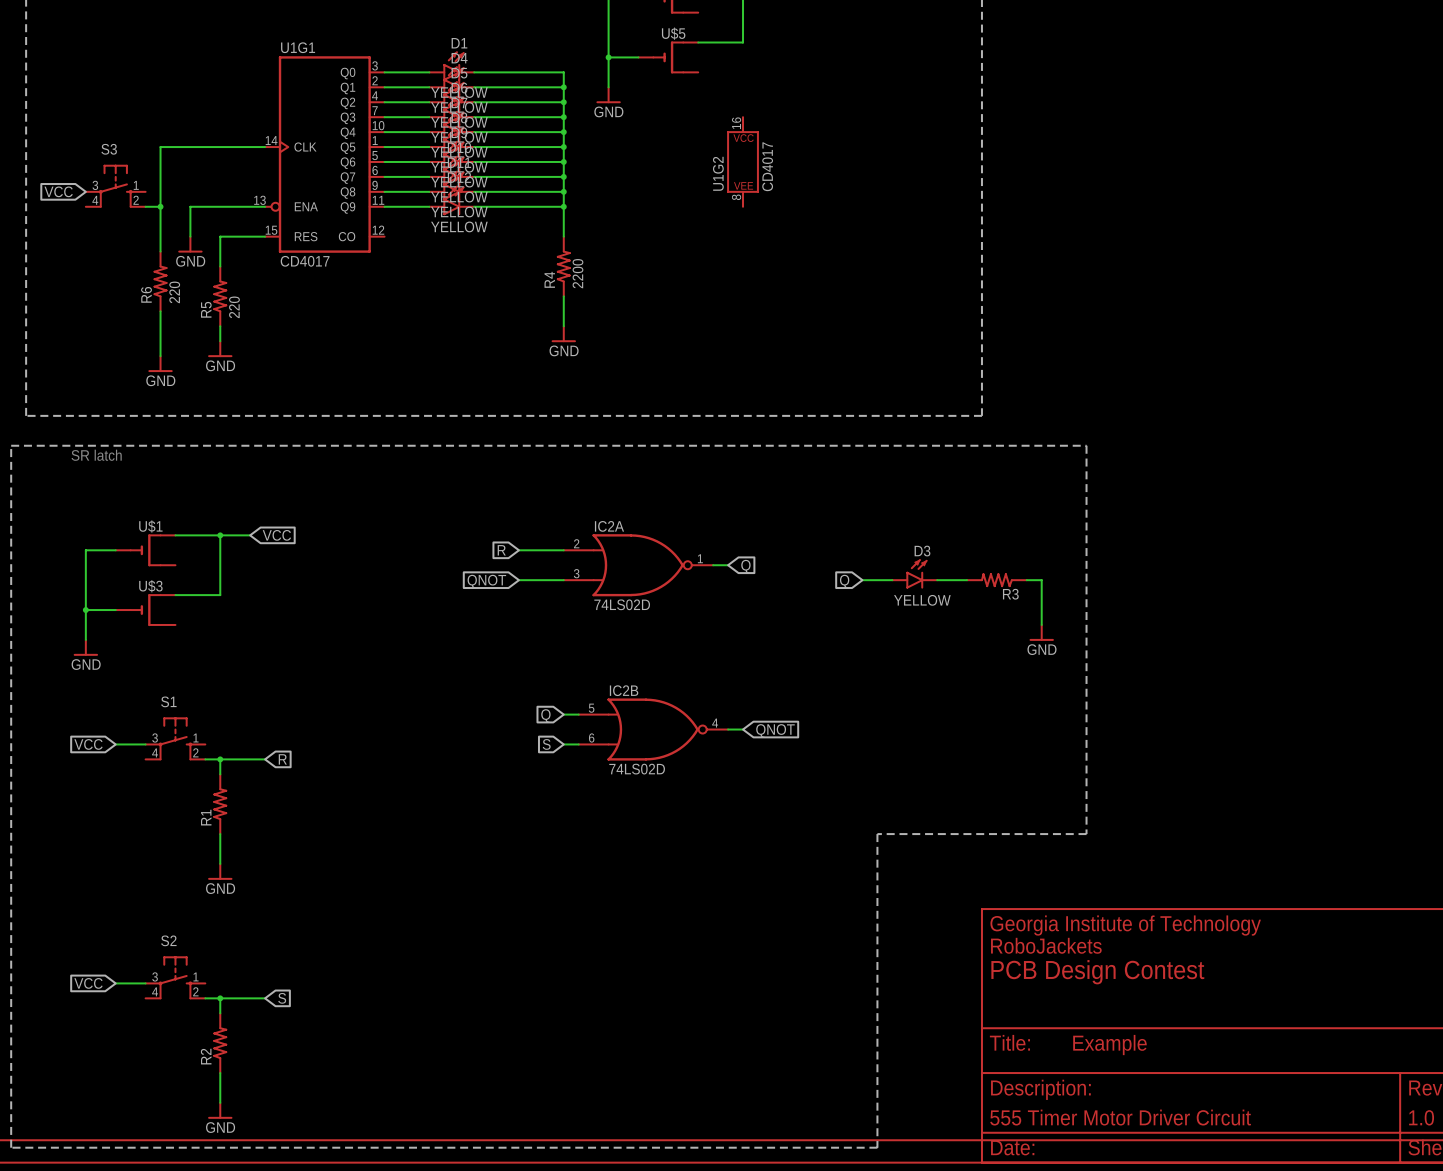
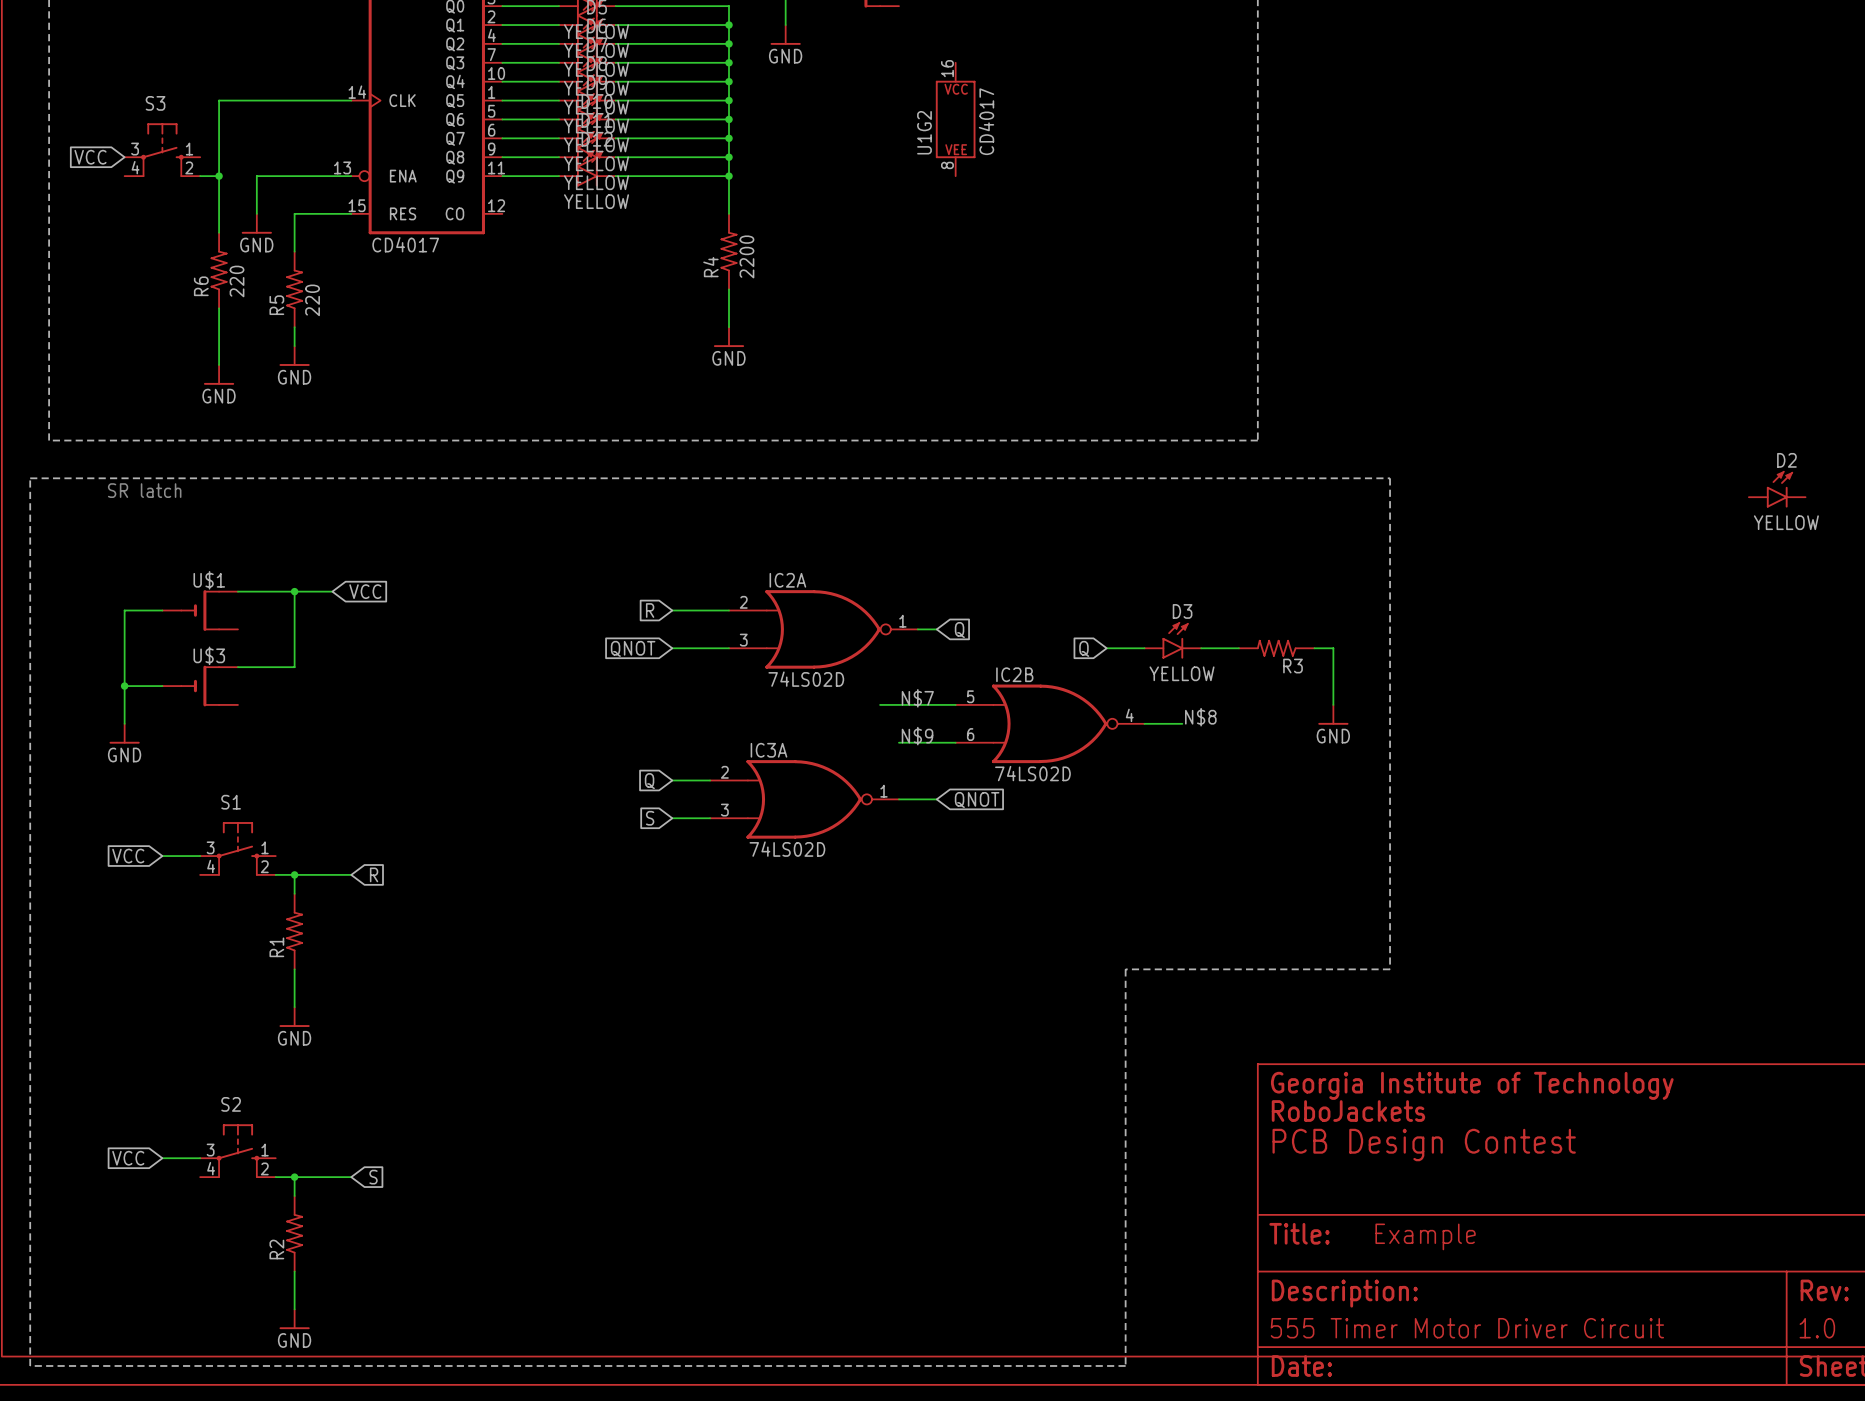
D2: none -> YELLOW (1777, 489)
label: none -> N$7 (917, 698)
wire: none -> (880, 704) (955, 704)
label: none -> N$8 (1200, 717)
wire: none -> (1144, 723) (1182, 723)
label: none -> N$9 (917, 736)
wire: none -> (898, 742) (955, 742)
wire: none -> (672, 780) (710, 780)
IC3A: none -> 74LS02D (804, 799)
wire: none -> (898, 799) (936, 799)
wire: none -> (672, 818) (710, 818)
global label position: Q (545, 715) -> Q (649, 781)
IC2B position: (653, 729) -> (1050, 723)
wire: (728, 729) (743, 729) -> none
global label position: QNOT (775, 730) -> QNOT (977, 800)
global label position: S (546, 744) -> S (650, 818)
wire: (563, 744) (578, 744) -> none

